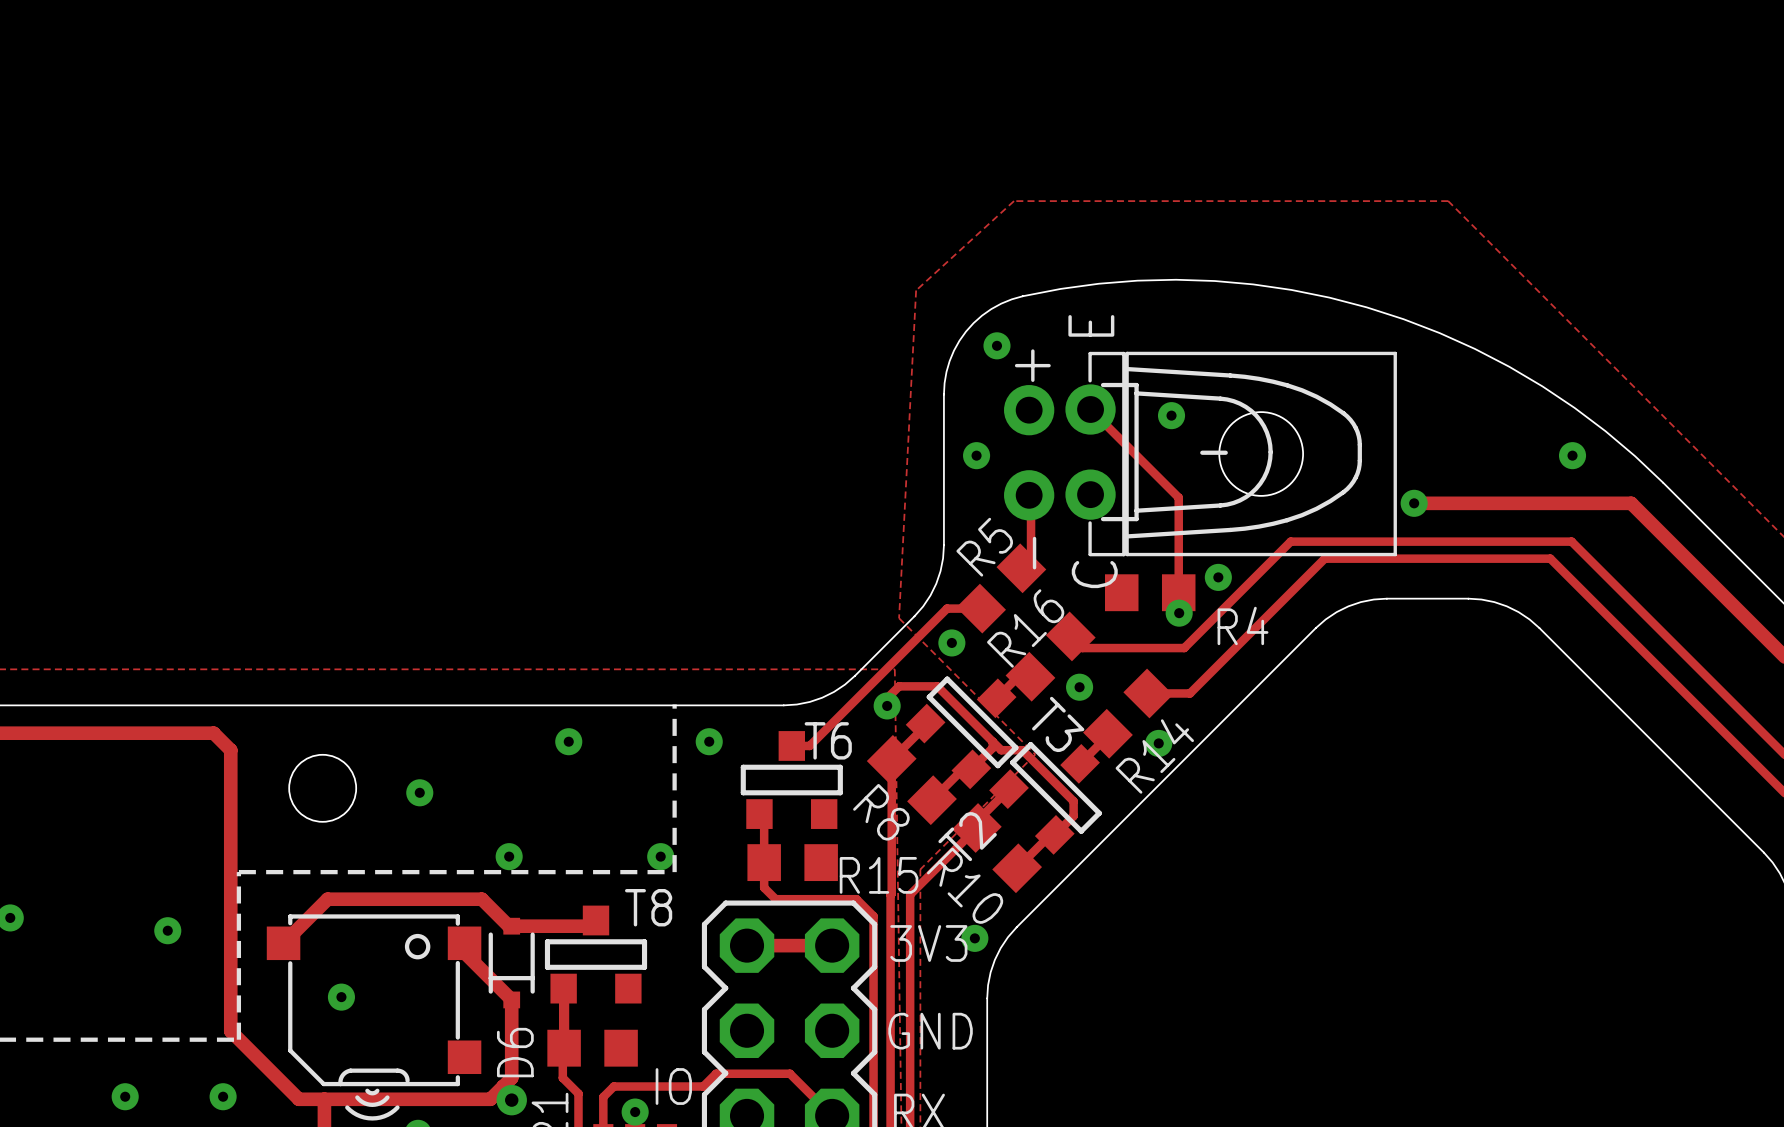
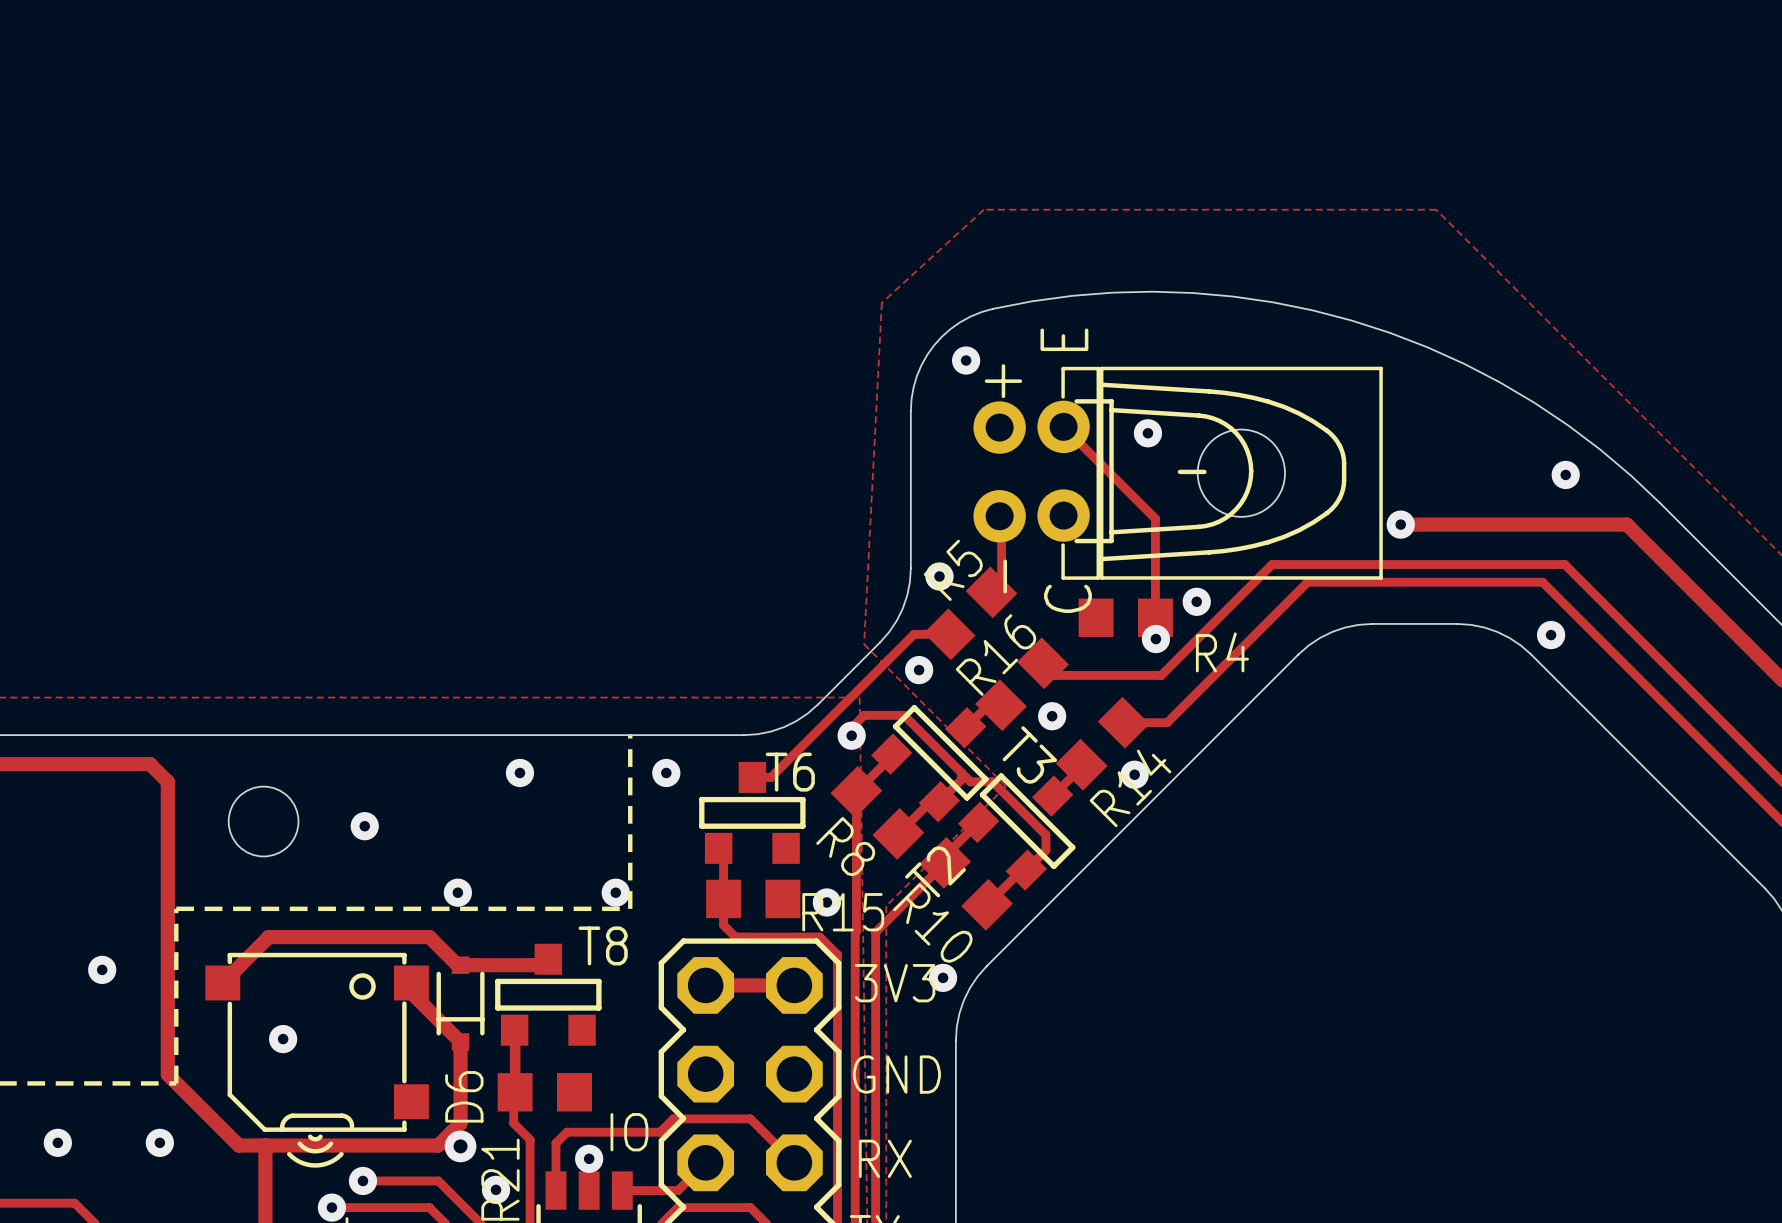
via position: (976, 455) -> (939, 576)
via: none -> (1551, 635)
via: none -> (826, 902)

